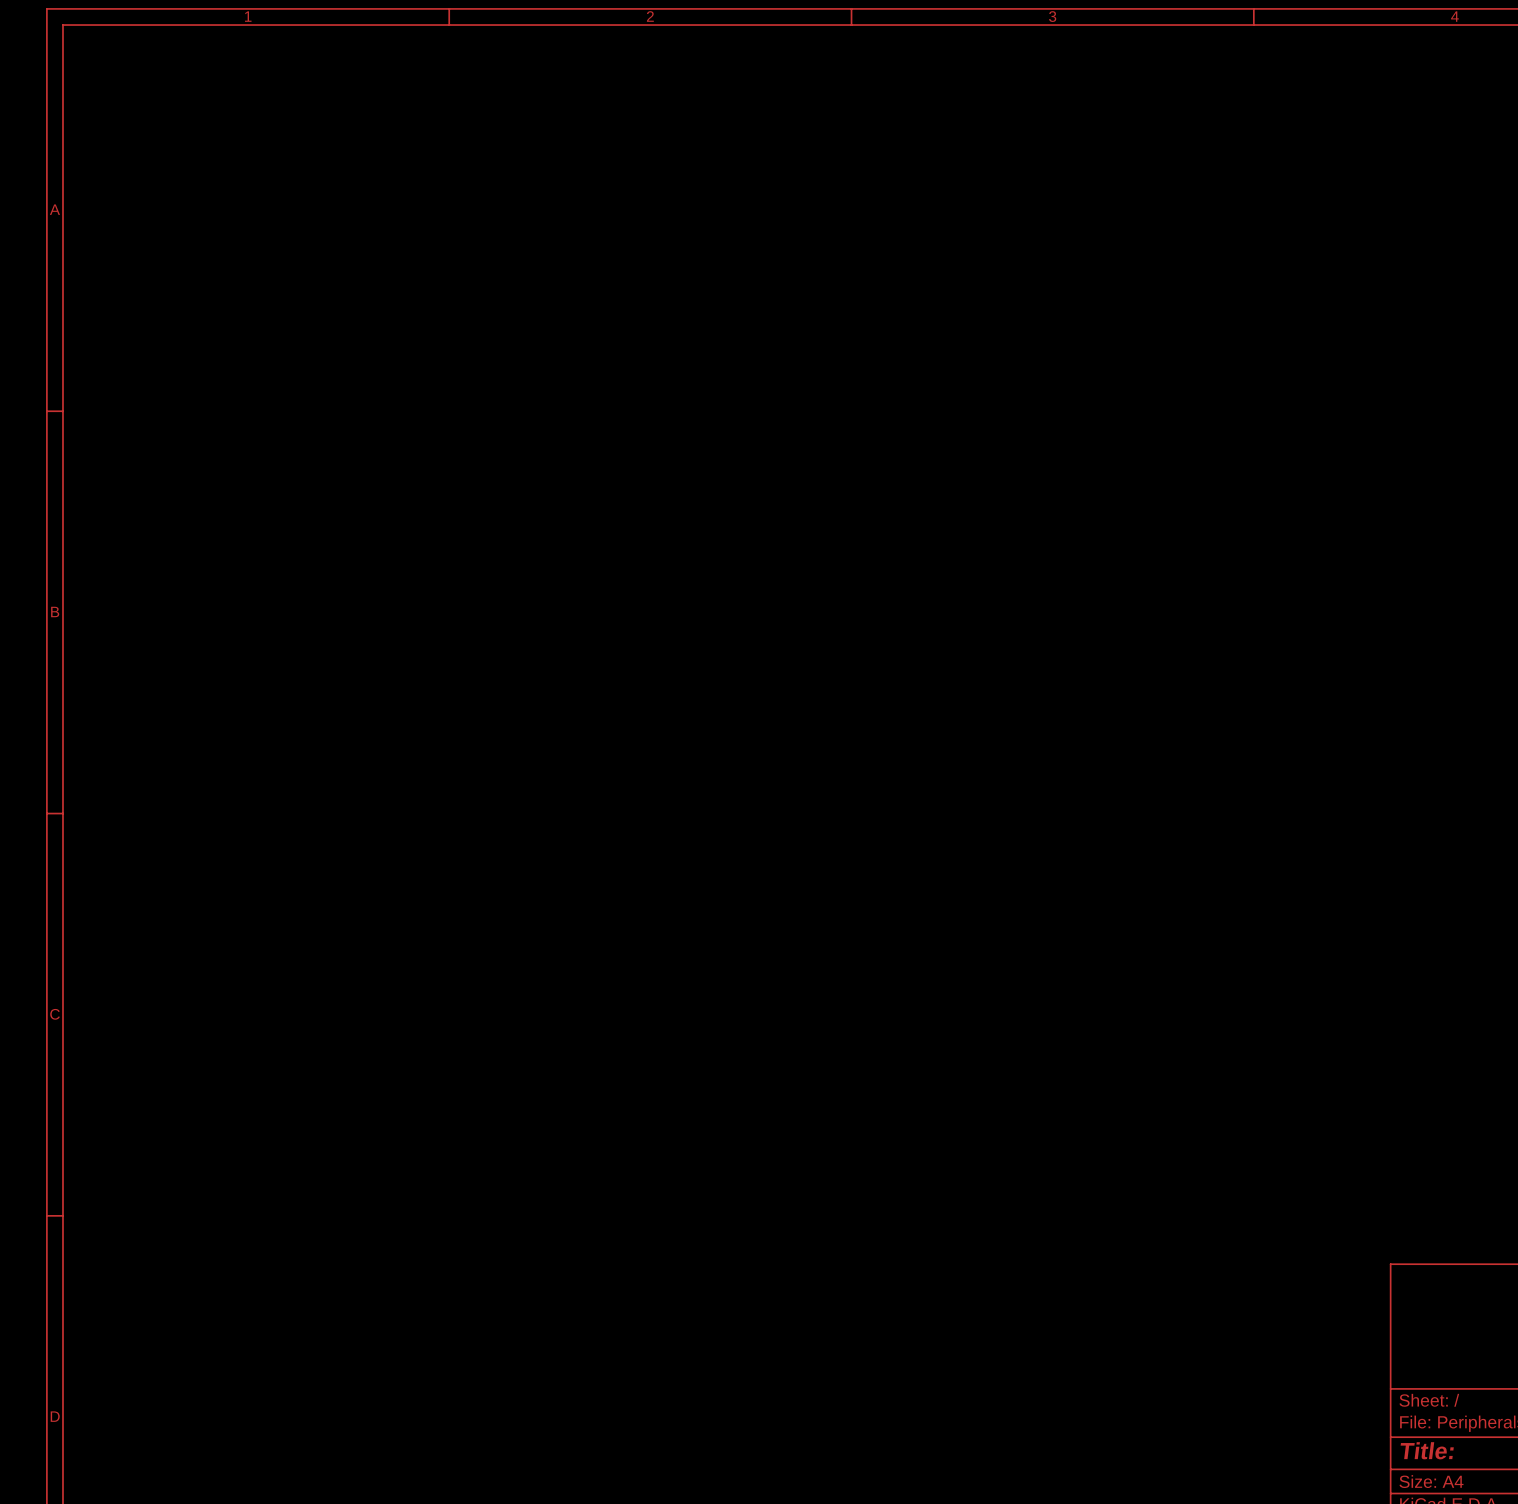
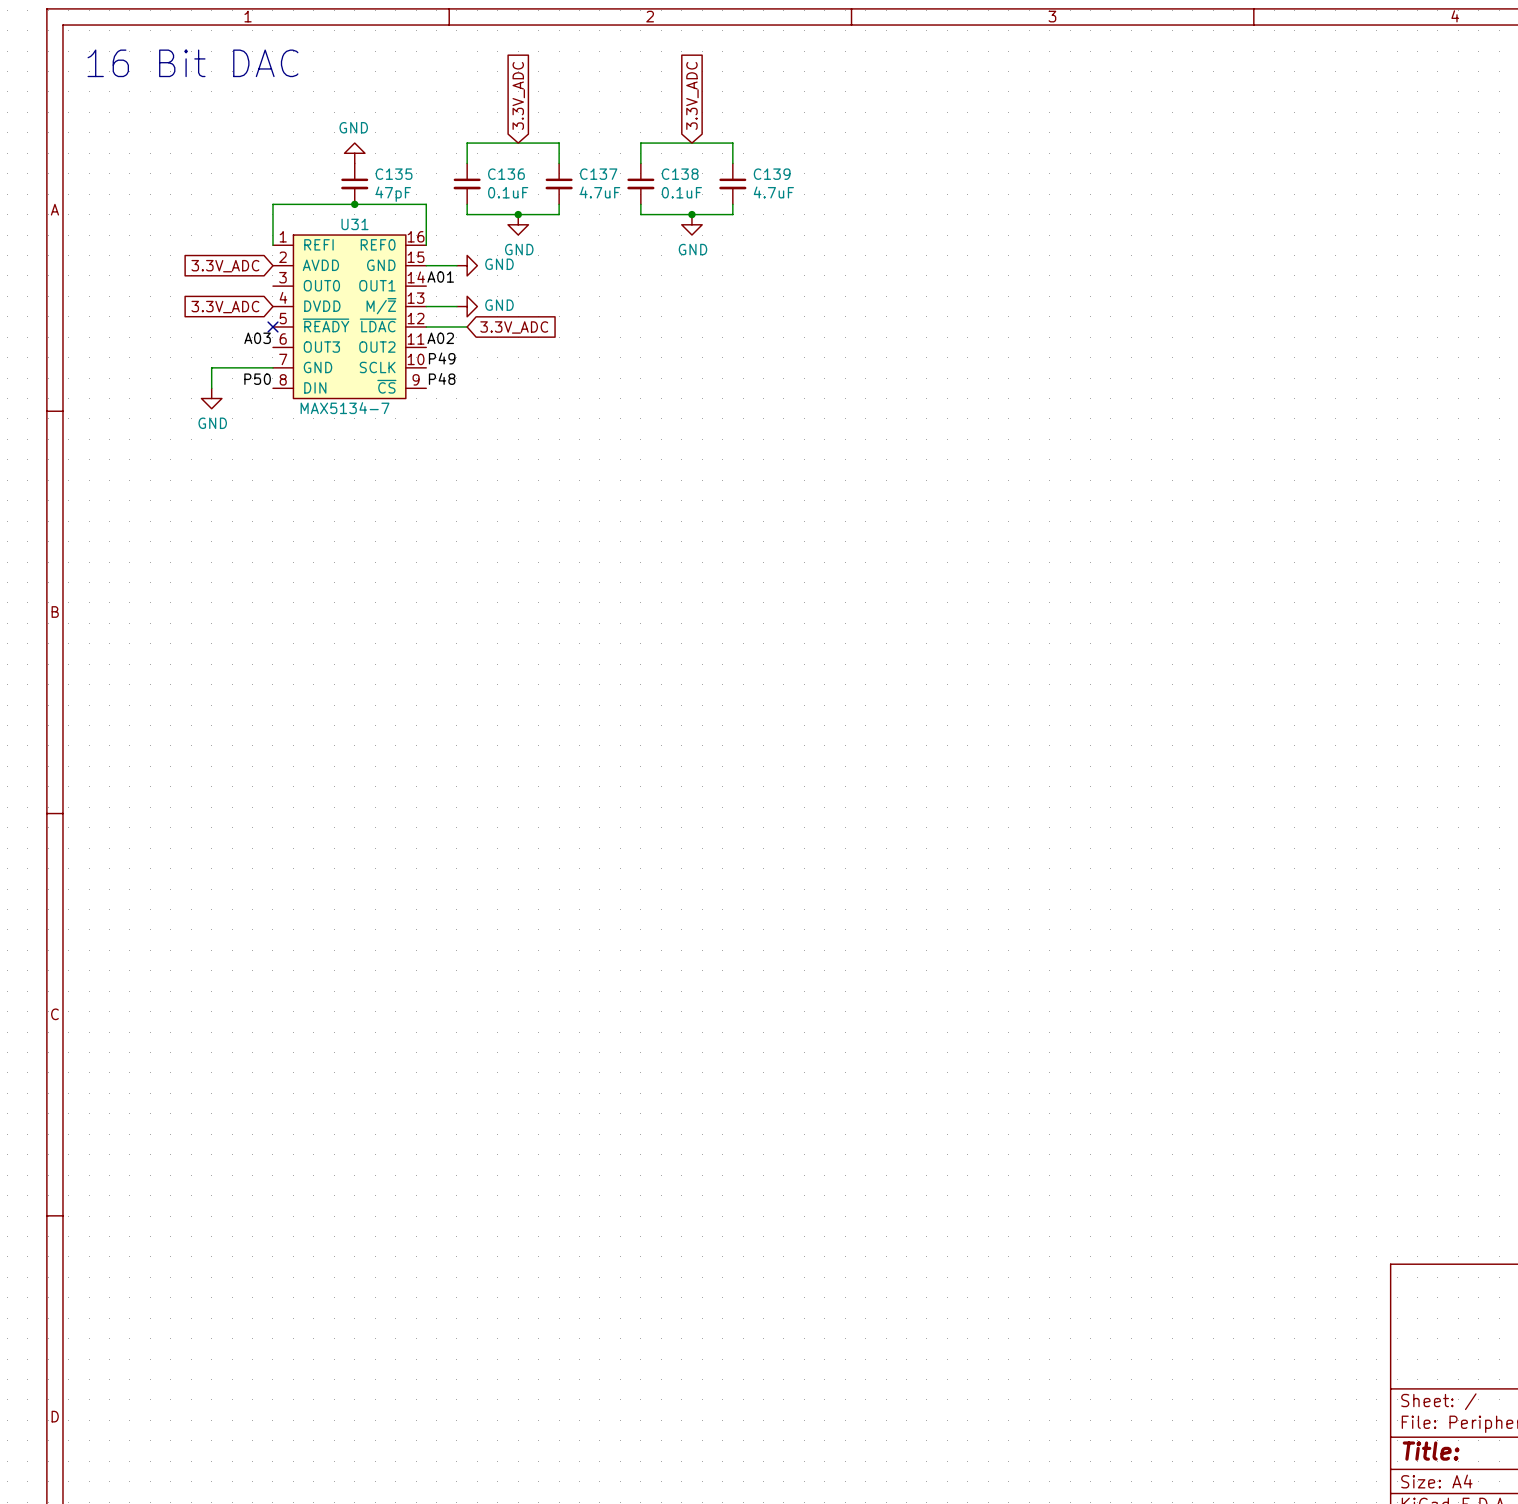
text: none -> 16 Bit DAC (192, 63)
global label: none -> 3.3V_ADC (518, 95)
global label: none -> 3.3V_ADC (692, 95)
power symbol: none -> GND (354, 153)
wire: none -> (467, 163) (467, 143) (559, 143) (559, 163)
wire: none -> (640, 163) (640, 143) (732, 143) (732, 163)
C135: none -> 47pF (354, 183)
C136: none -> 0.1uF (467, 183)
C137: none -> 4.7uF (559, 183)
C138: none -> 0.1uF (640, 183)
C139: none -> 4.7uF (732, 183)
junction: none -> (354, 204)
wire: none -> (467, 204) (467, 214) (559, 214) (559, 204)
wire: none -> (640, 204) (640, 214) (732, 214) (732, 204)
junction: none -> (518, 214)
junction: none -> (691, 214)
power symbol: none -> GND (518, 224)
power symbol: none -> GND (691, 224)
wire: none -> (272, 245) (272, 204) (426, 204) (426, 245)
wire: none -> (426, 265) (456, 265)
power symbol: none -> GND (467, 265)
global label: none -> 3.3V_ADC (225, 266)
label: none -> A01 (440, 276)
wire: none -> (426, 306) (456, 306)
power symbol: none -> GND (467, 306)
global label: none -> 3.3V_ADC (225, 307)
U31: none -> MAX5134-7 (349, 316)
no-connect mark: none -> (272, 326)
wire: none -> (426, 326) (467, 326)
global label: none -> 3.3V_ADC (514, 327)
label: none -> A03 (257, 338)
label: none -> A02 (440, 338)
label: none -> P49 (442, 358)
wire: none -> (272, 367) (211, 367) (211, 388)
label: none -> P50 (257, 379)
label: none -> P48 (442, 378)
power symbol: none -> GND (211, 398)

